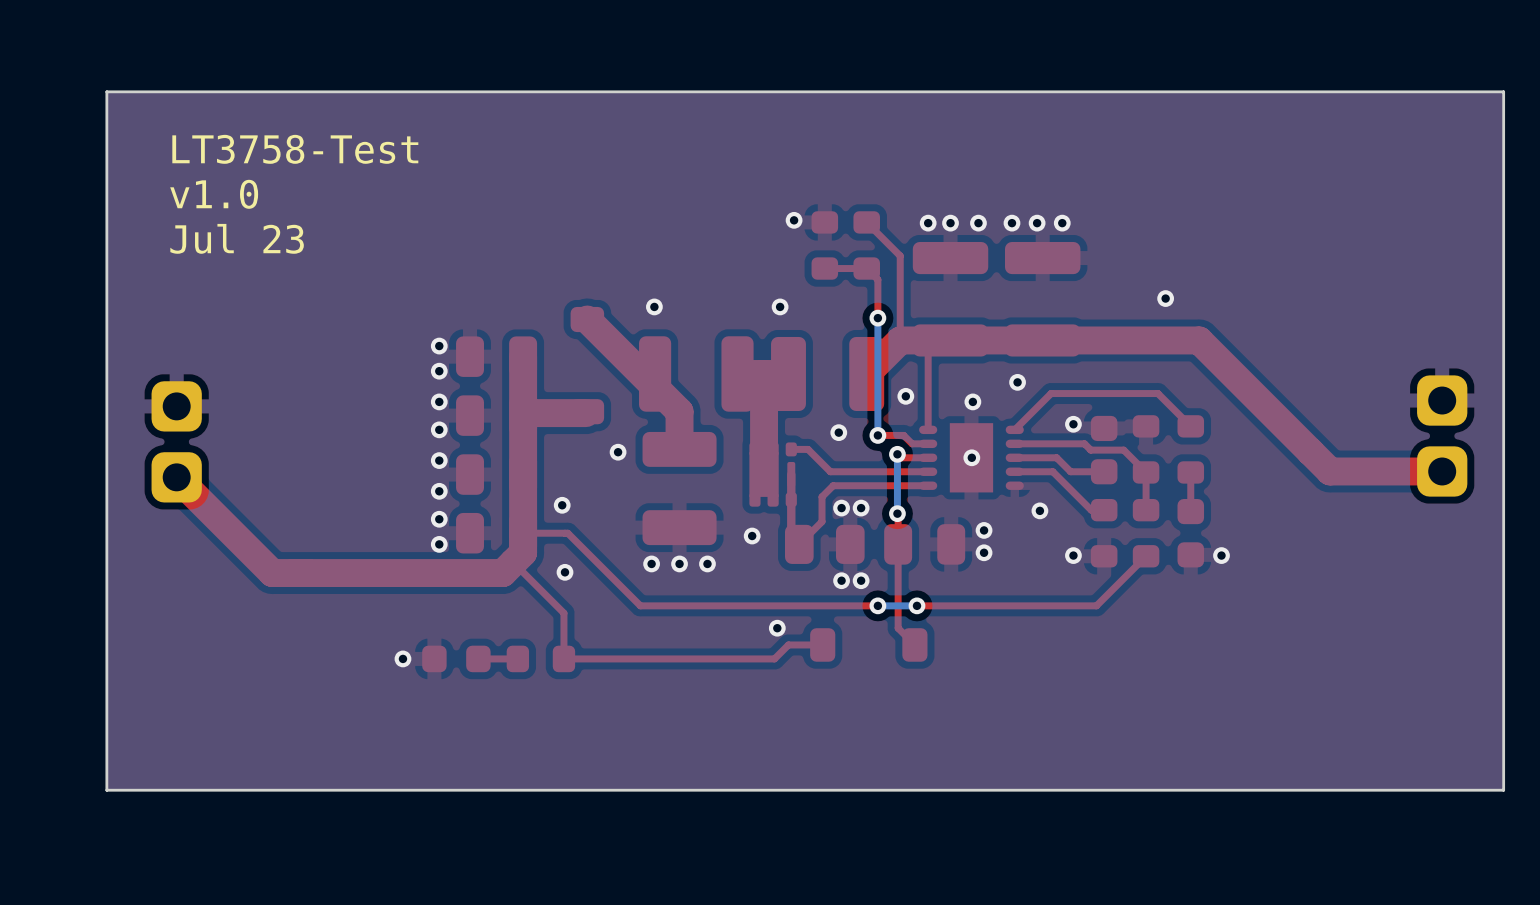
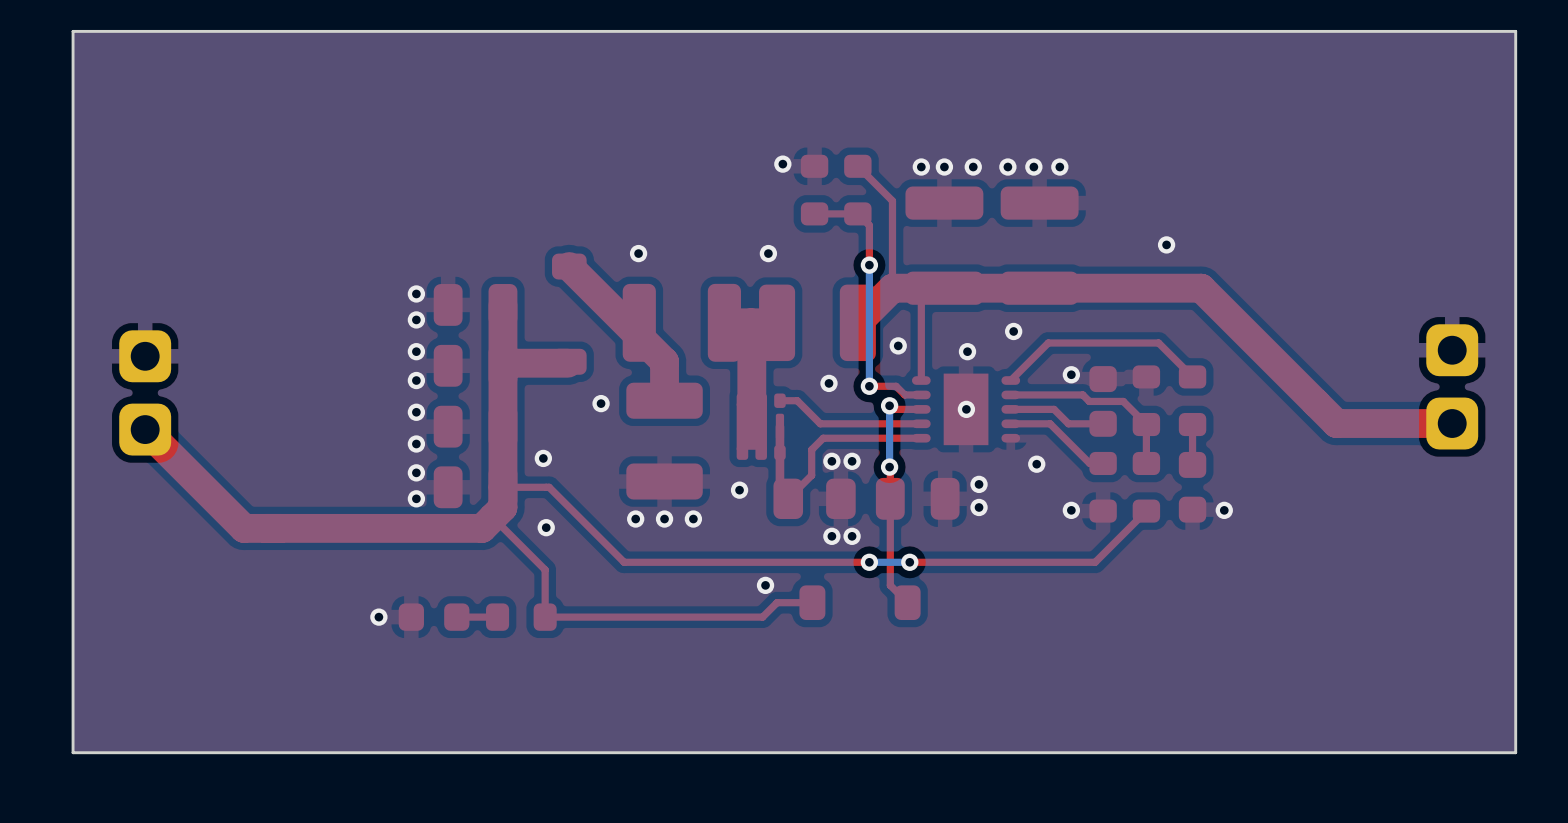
text: LT3758-Test (295, 149) -> none
text: v1.0 (214, 194) -> none
text: Jul 23 (237, 238) -> none

